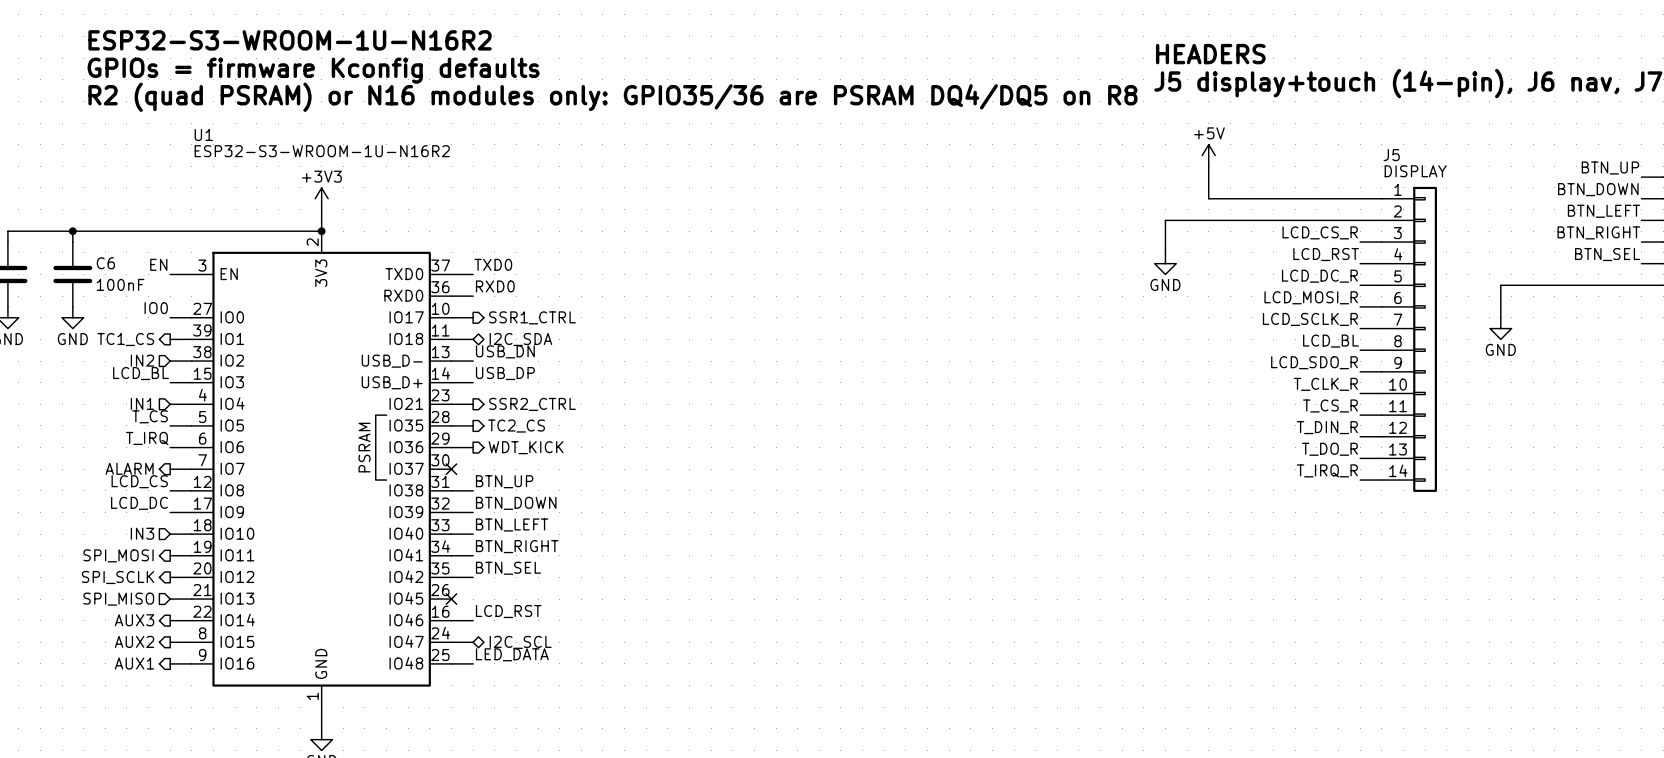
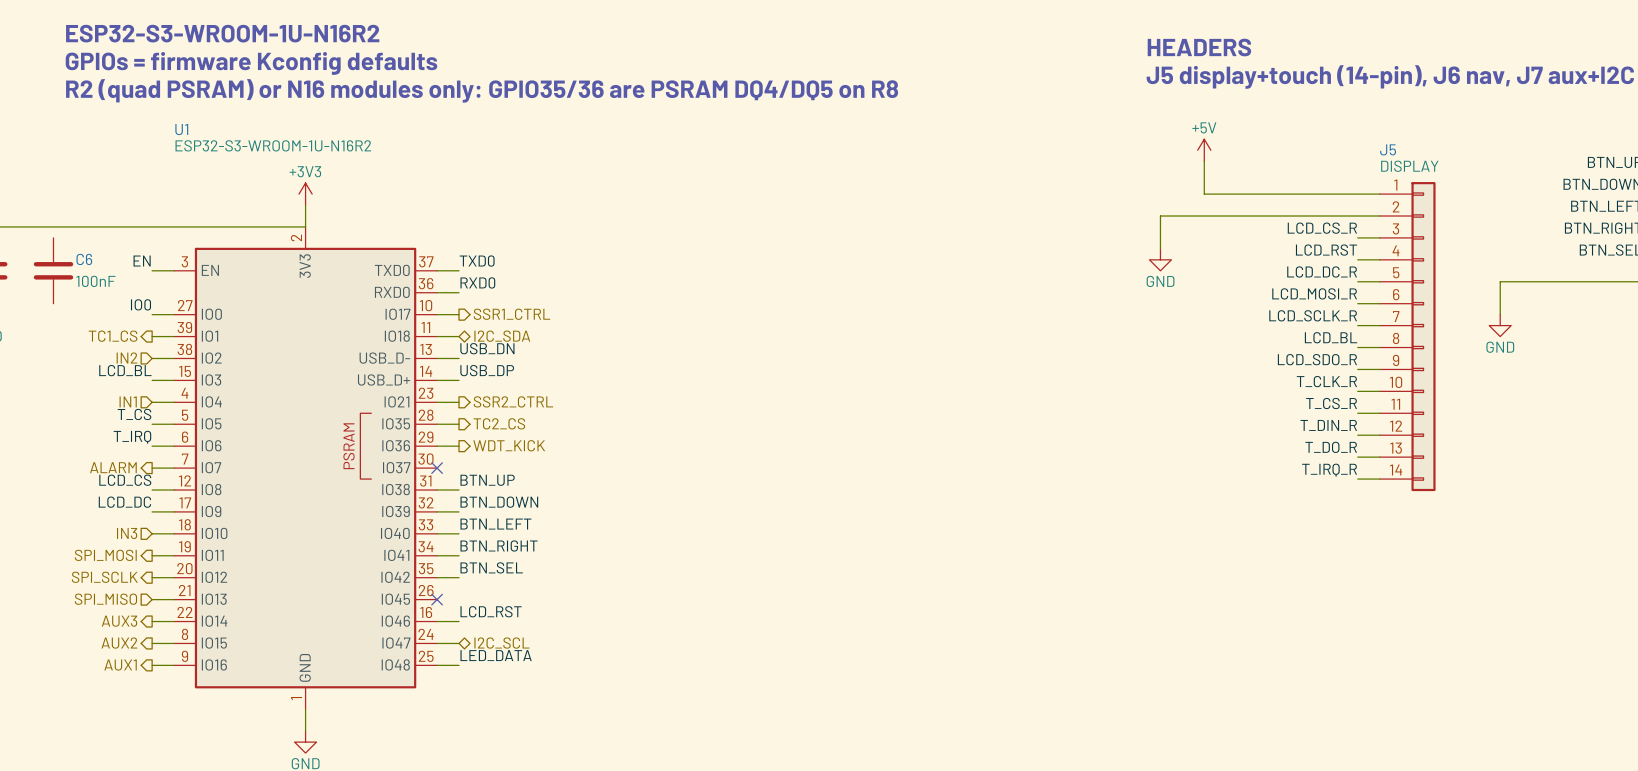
wire: (72, 231) (72, 242) -> none
junction: (72, 231) -> none
junction: (321, 231) -> none
power symbol: GND (72, 317) -> none

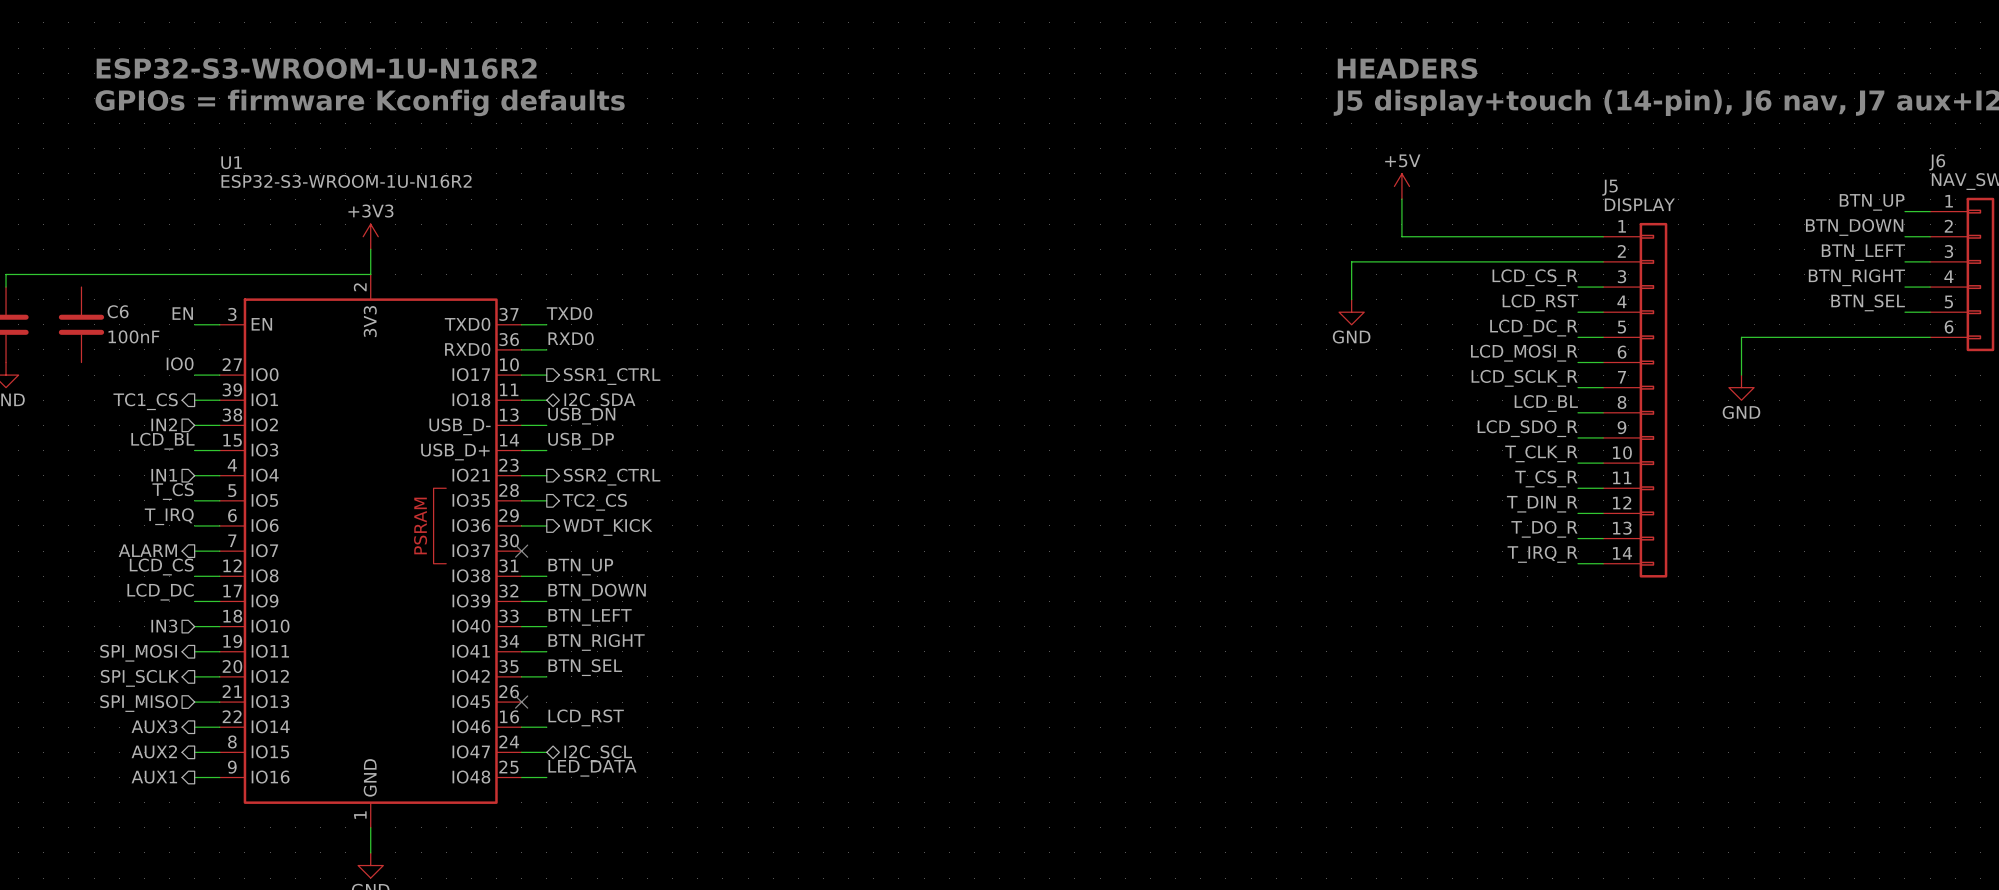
text position: ESP32-S3-WROOM-1U-N16R2 (222, 33) -> ESP32-S3-WROOM-1U-N16R2 (316, 68)
text position: GPIOs = firmware Kconfig defaults (251, 63) -> GPIOs = firmware Kconfig defaults (360, 102)
text: R2 (quad PSRAM) or N16 modules only: GPIO35/36 are PSRAM DQ4/DQ5 on R8 (482, 90) -> none

